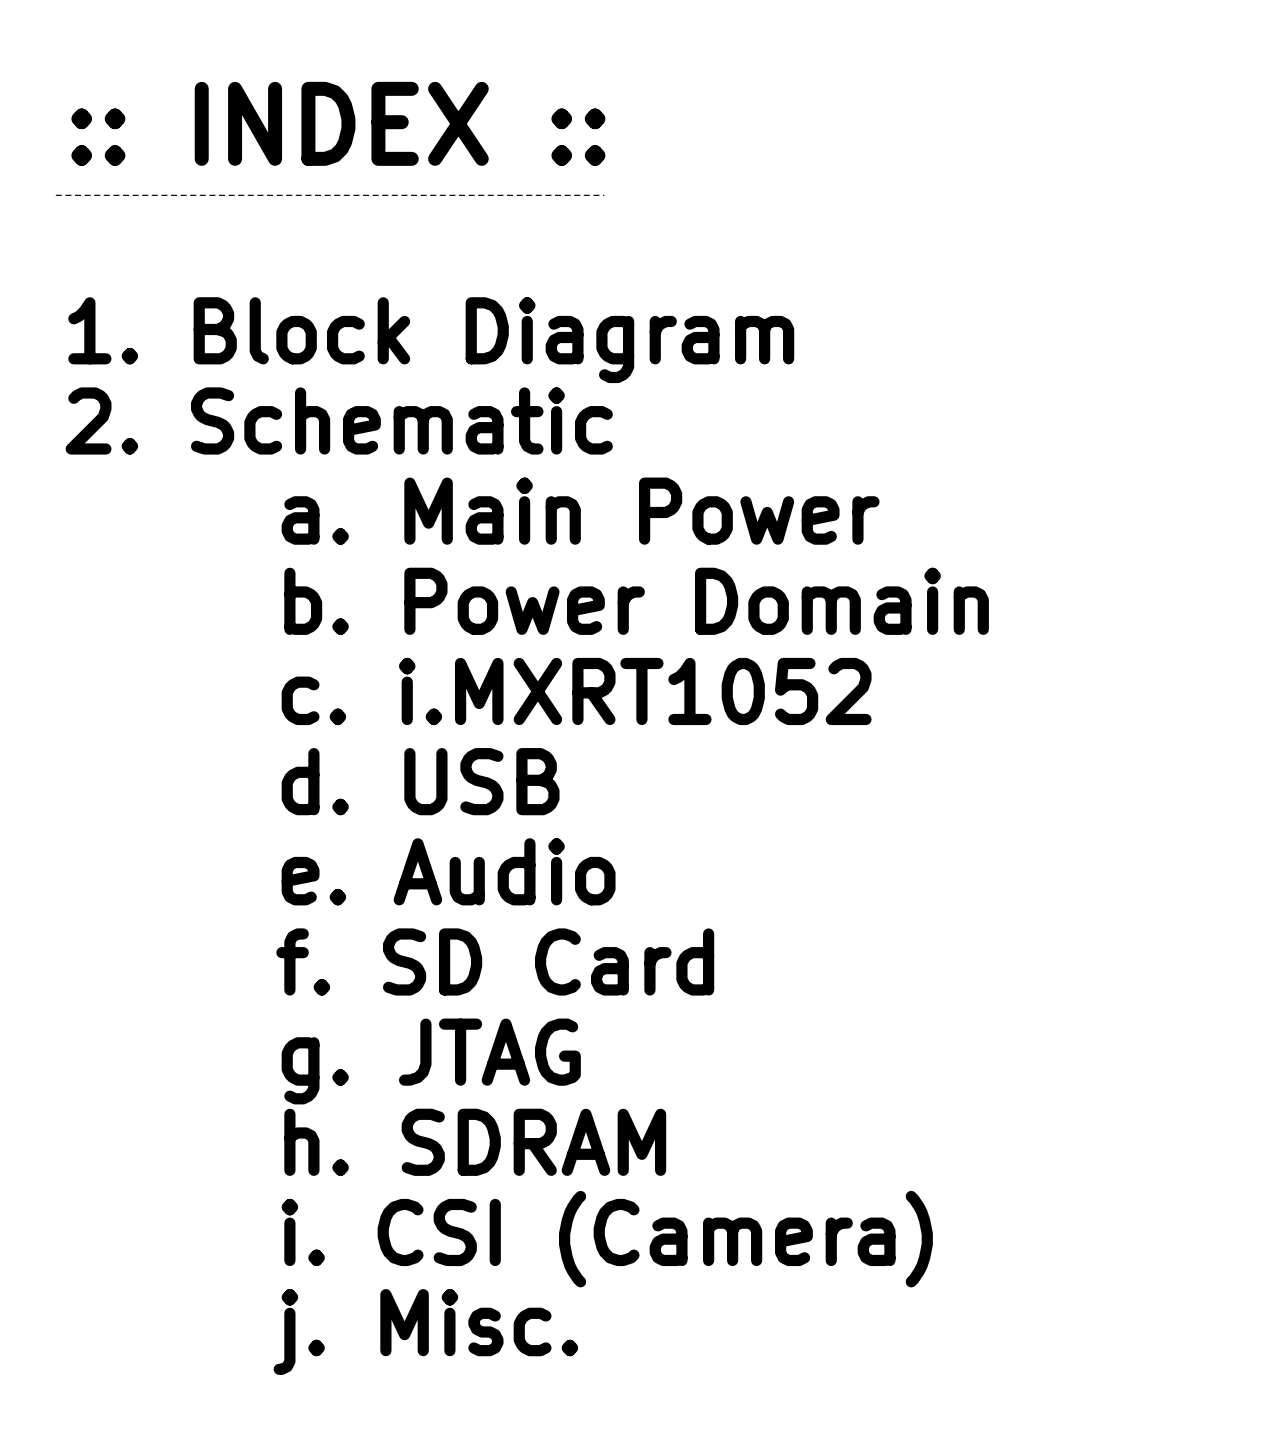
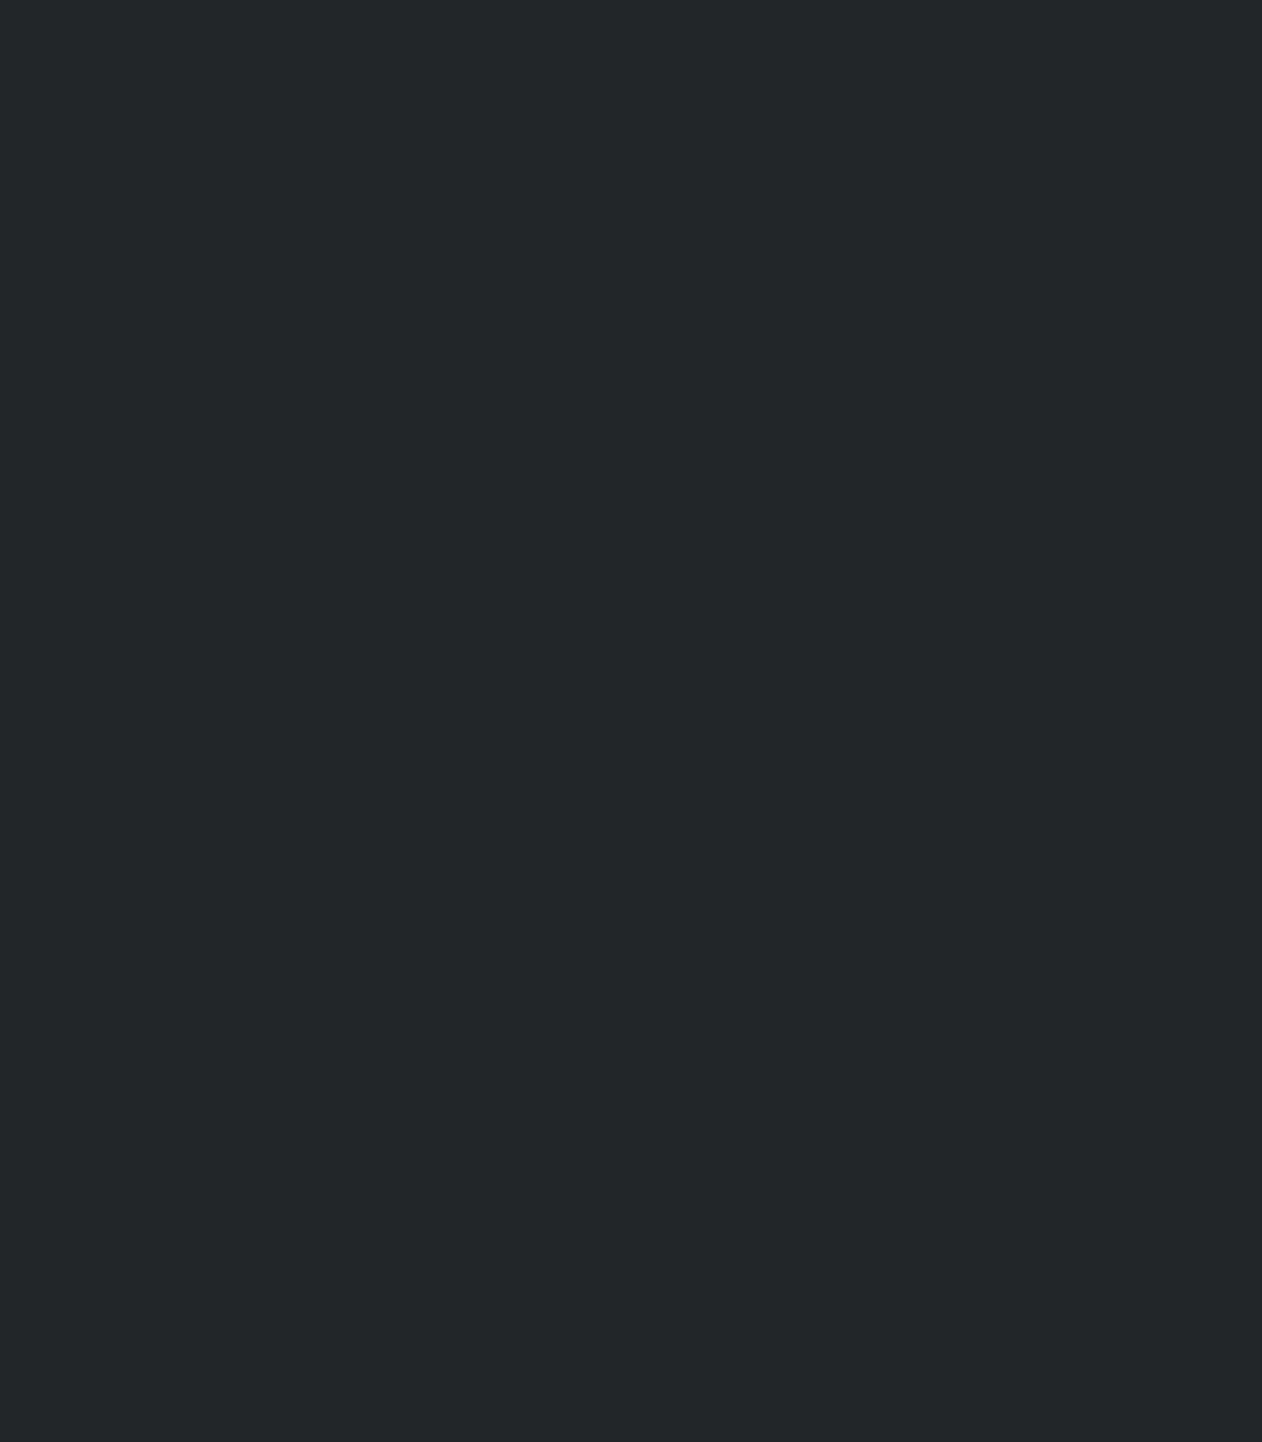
text: :: INDEX :: (338, 123) -> none
line: (55, 195) (604, 195) -> none
text: 1. Block Diagram (431, 340) -> none
text: 2. Schematic (339, 420) -> none
text: a. Main Power (580, 511) -> none
text: b. Power Domain (636, 601) -> none
text: c. i.MXRT1052 (576, 691) -> none
text: d. USB (420, 781) -> none
text: e. Audio (448, 871) -> none
text: f. SD Card (495, 961) -> none
text: g. JTAG (431, 1061) -> none
text: h. SDRAM (475, 1142) -> none
text: i. CSI (Camera) (607, 1239) -> none
text: j. Misc. (425, 1331) -> none

